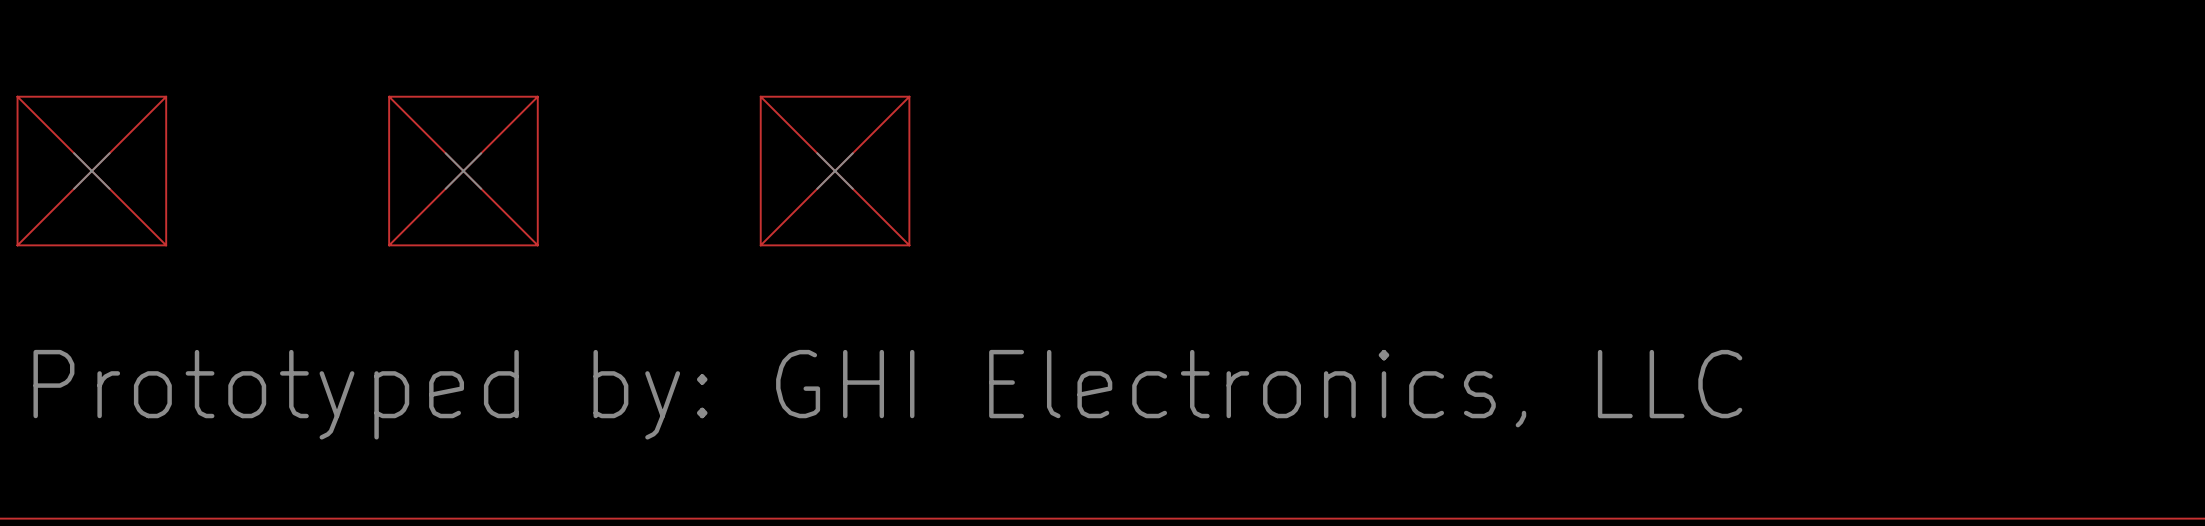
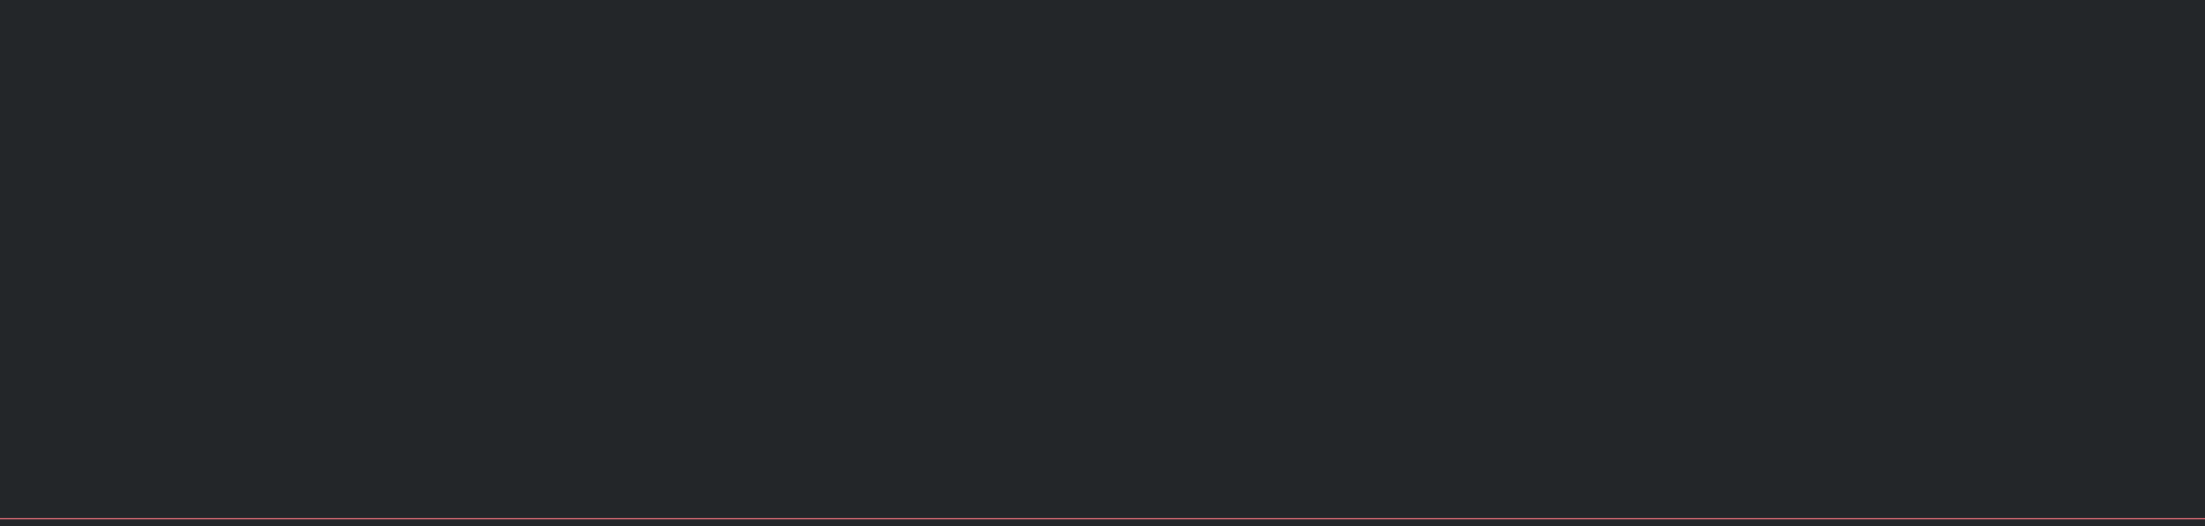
part: (91, 171) -> none
no-connect mark: (91, 171) -> none
part: (463, 171) -> none
no-connect mark: (463, 171) -> none
part: (835, 171) -> none
no-connect mark: (835, 171) -> none
text: Prototyped by: GHI Electronics, LLC (887, 394) -> none

